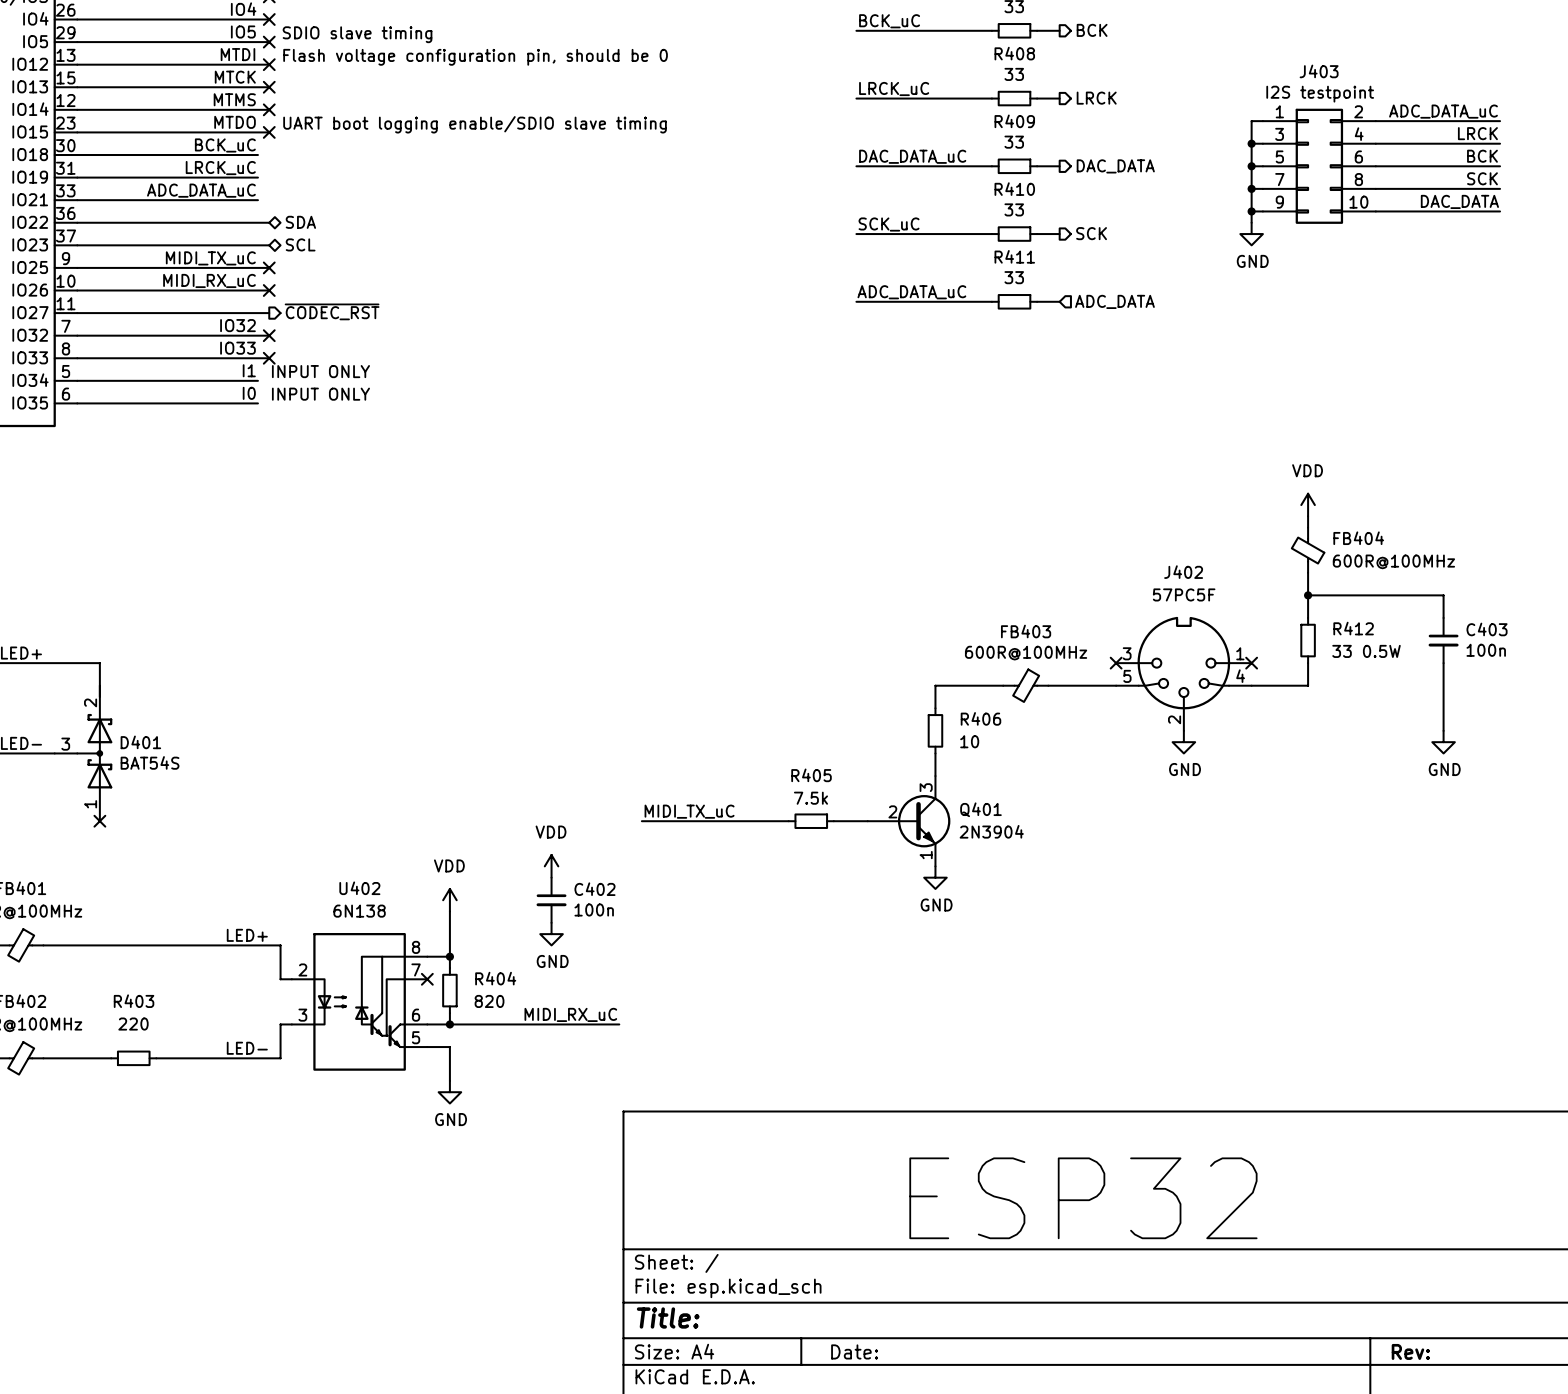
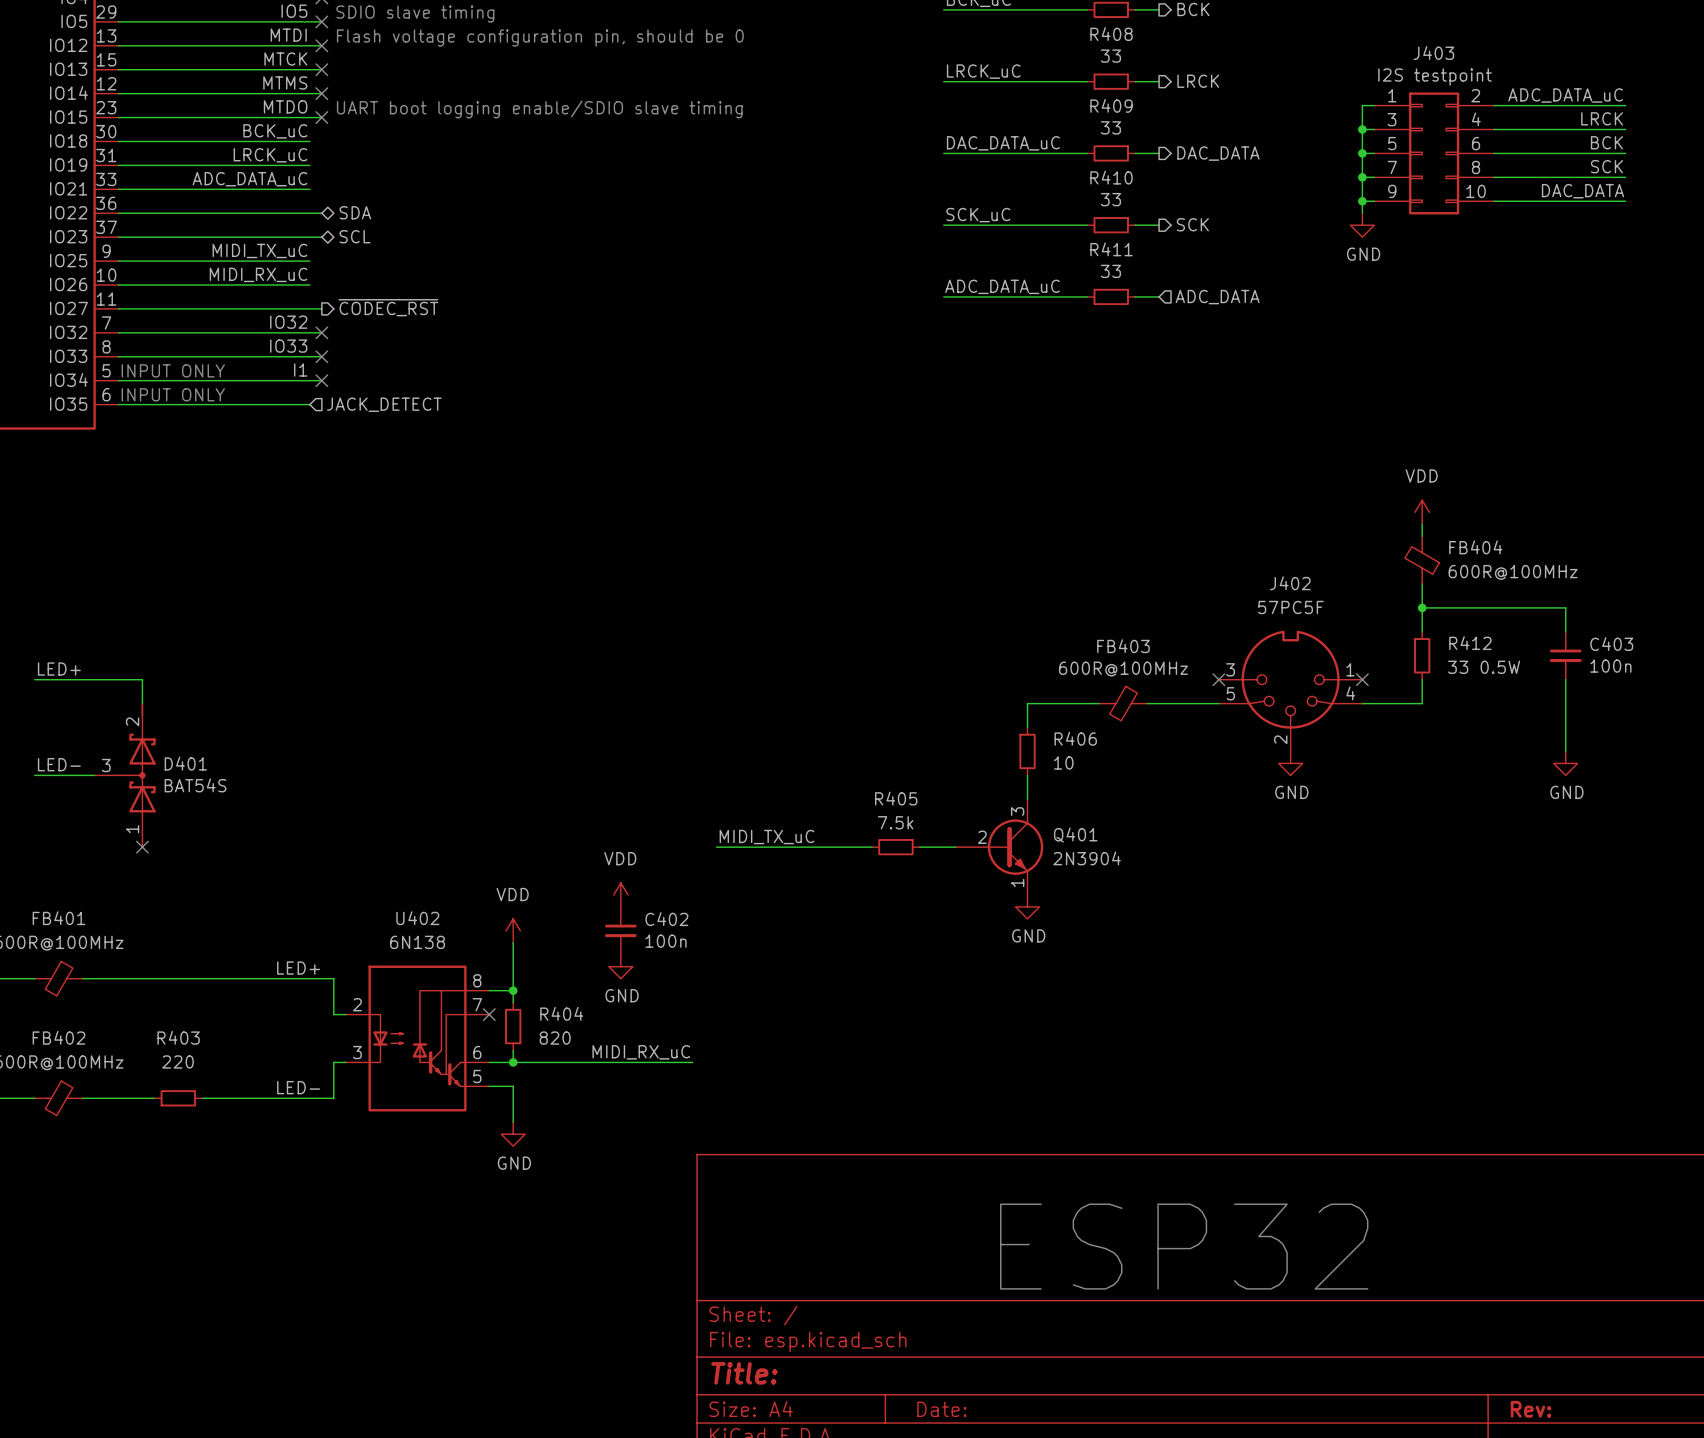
wire: (257, 267) (269, 267) -> none
no-connect mark: (269, 267) -> none
wire: (257, 290) (269, 290) -> (309, 380) (321, 380)
no-connect mark: (269, 290) -> none
text: none -> INPUT ONLY (173, 370)
text: INPUT ONLY (320, 371) -> none
no-connect mark: none -> (321, 380)
label: I0 (249, 393) -> none
text: none -> INPUT ONLY (173, 394)
text: INPUT ONLY (320, 394) -> none
hierarchical label: none -> JACK_DETECT (384, 404)

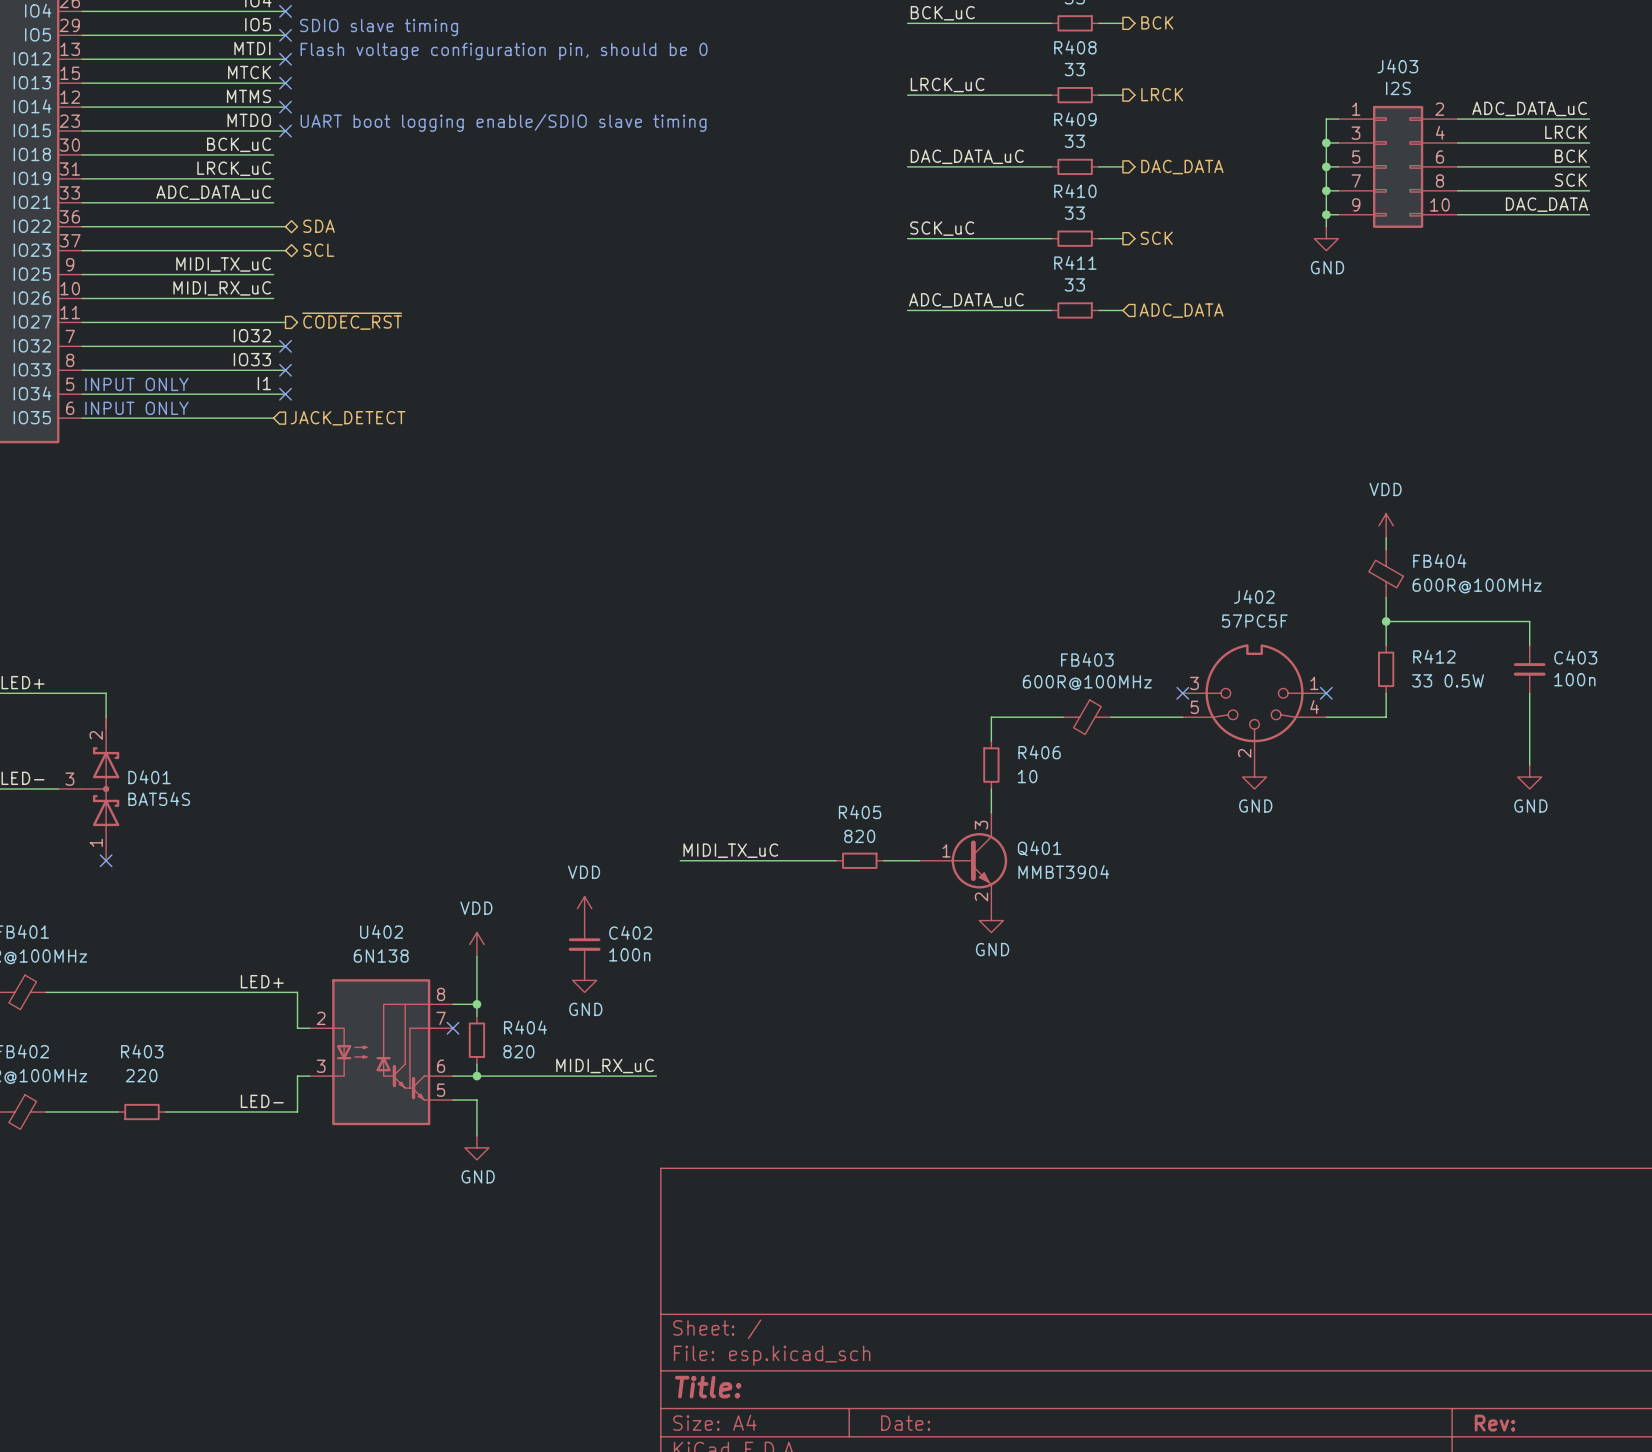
J403 value: I2S testpoint (1435, 77) -> I2S (1398, 88)
R405 value: 7.5k (895, 822) -> 820 (859, 836)
Q401 pin number: 2 (982, 837) -> 1 (946, 850)
Q401 value: 2N3904 (1087, 858) -> MMBT3904 (1063, 872)
Q401 pin number: 1 (1017, 883) -> 2 (981, 896)
text: ESP32 (1184, 1246) -> none

